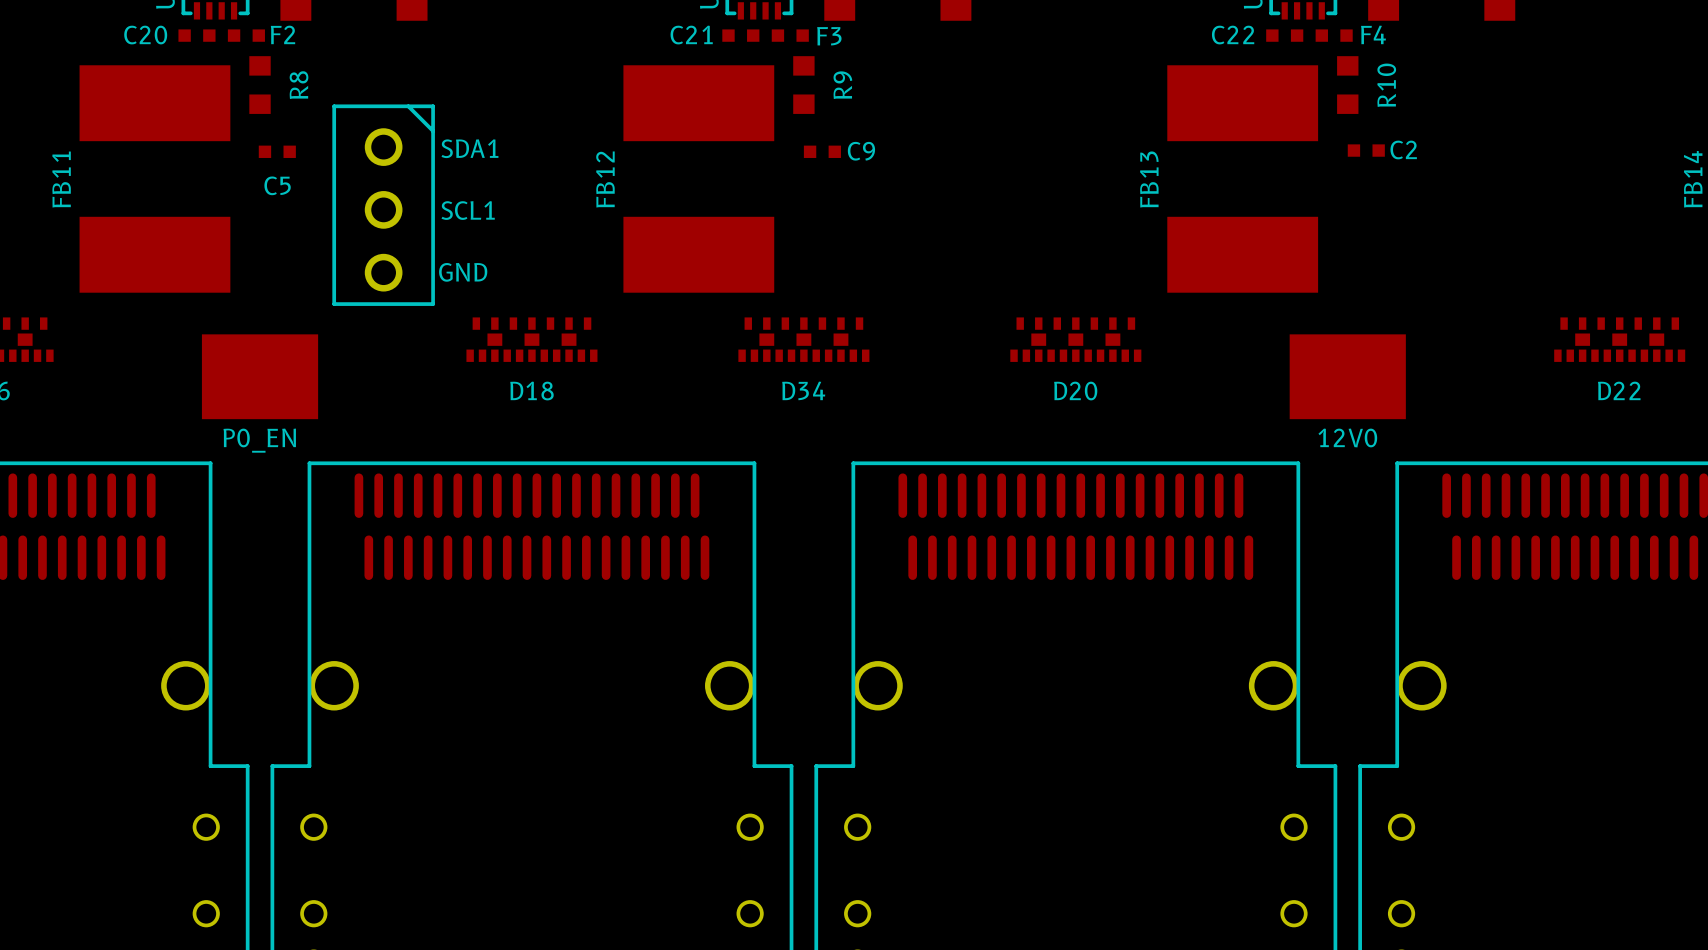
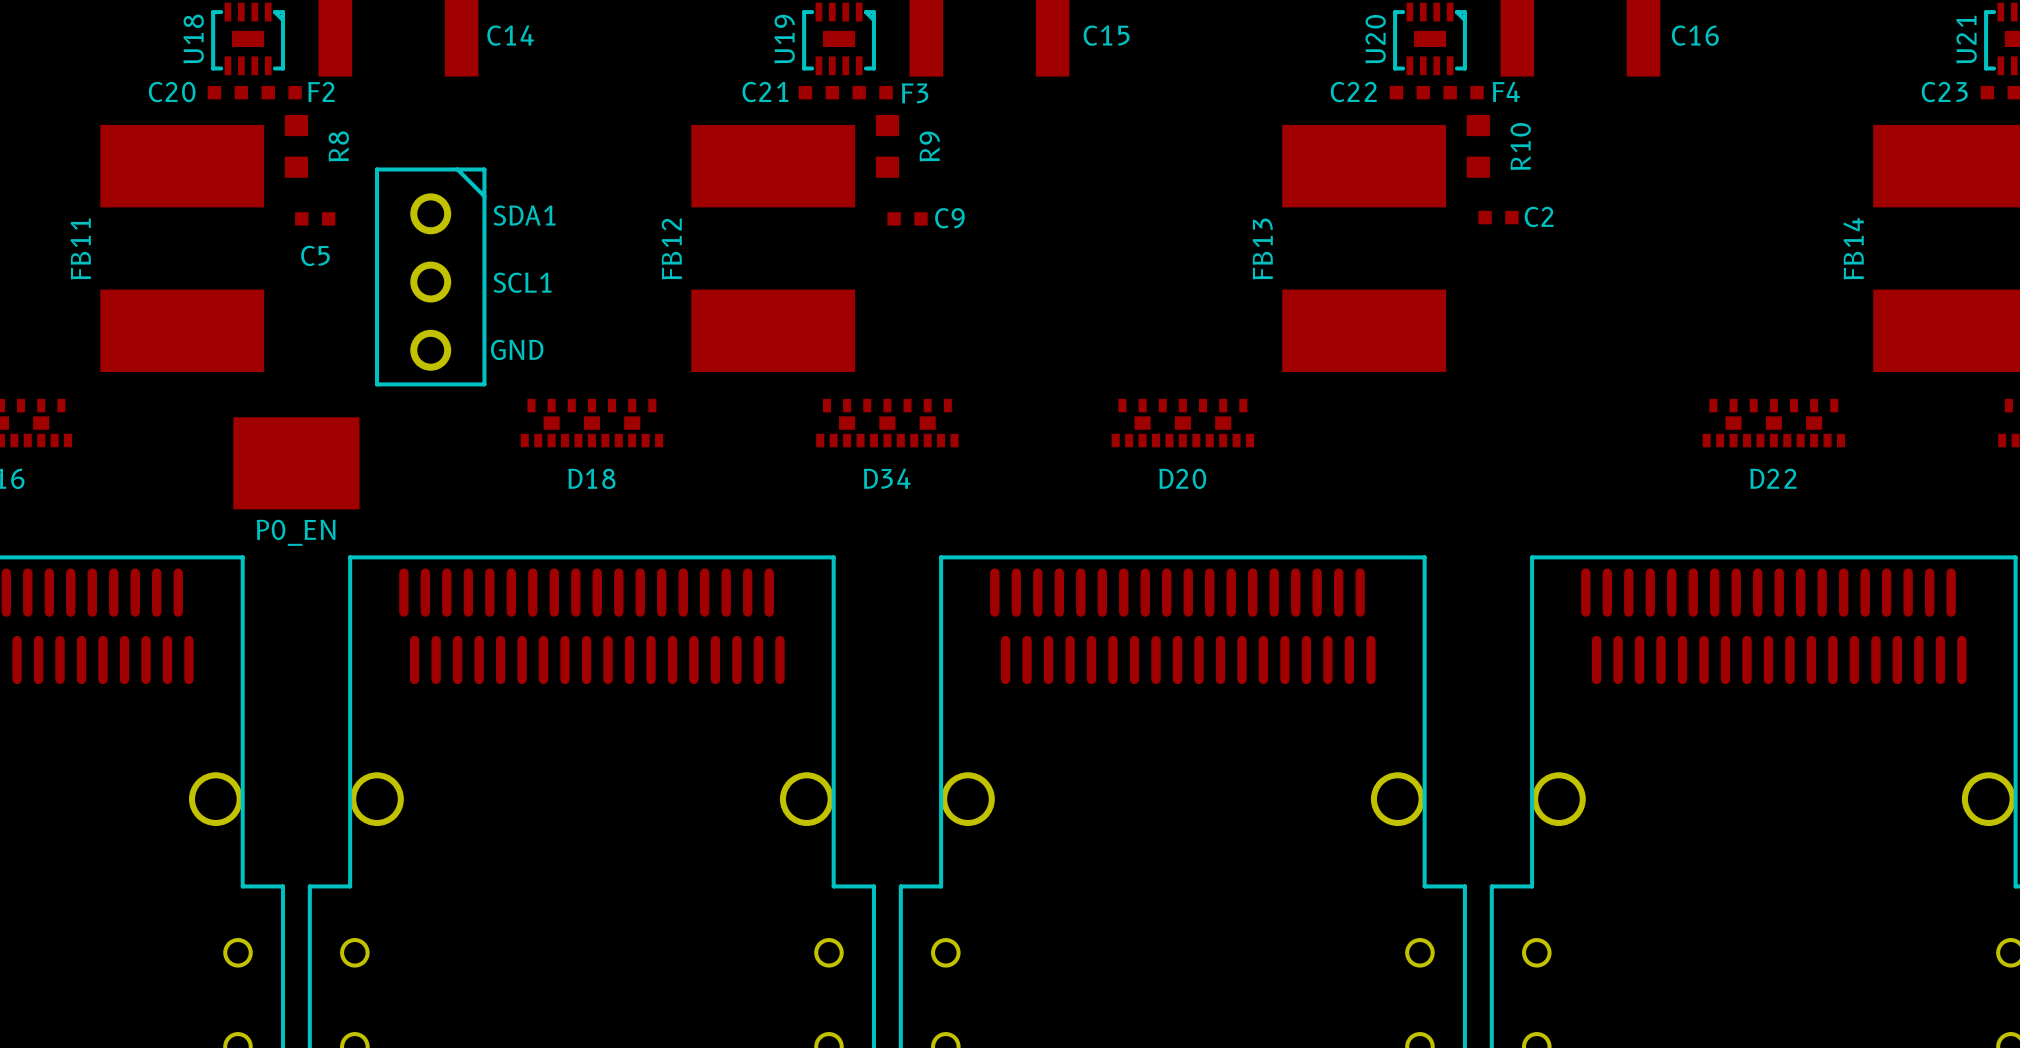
part: (1347, 376) -> none
text: 12V0 (1347, 437) -> none

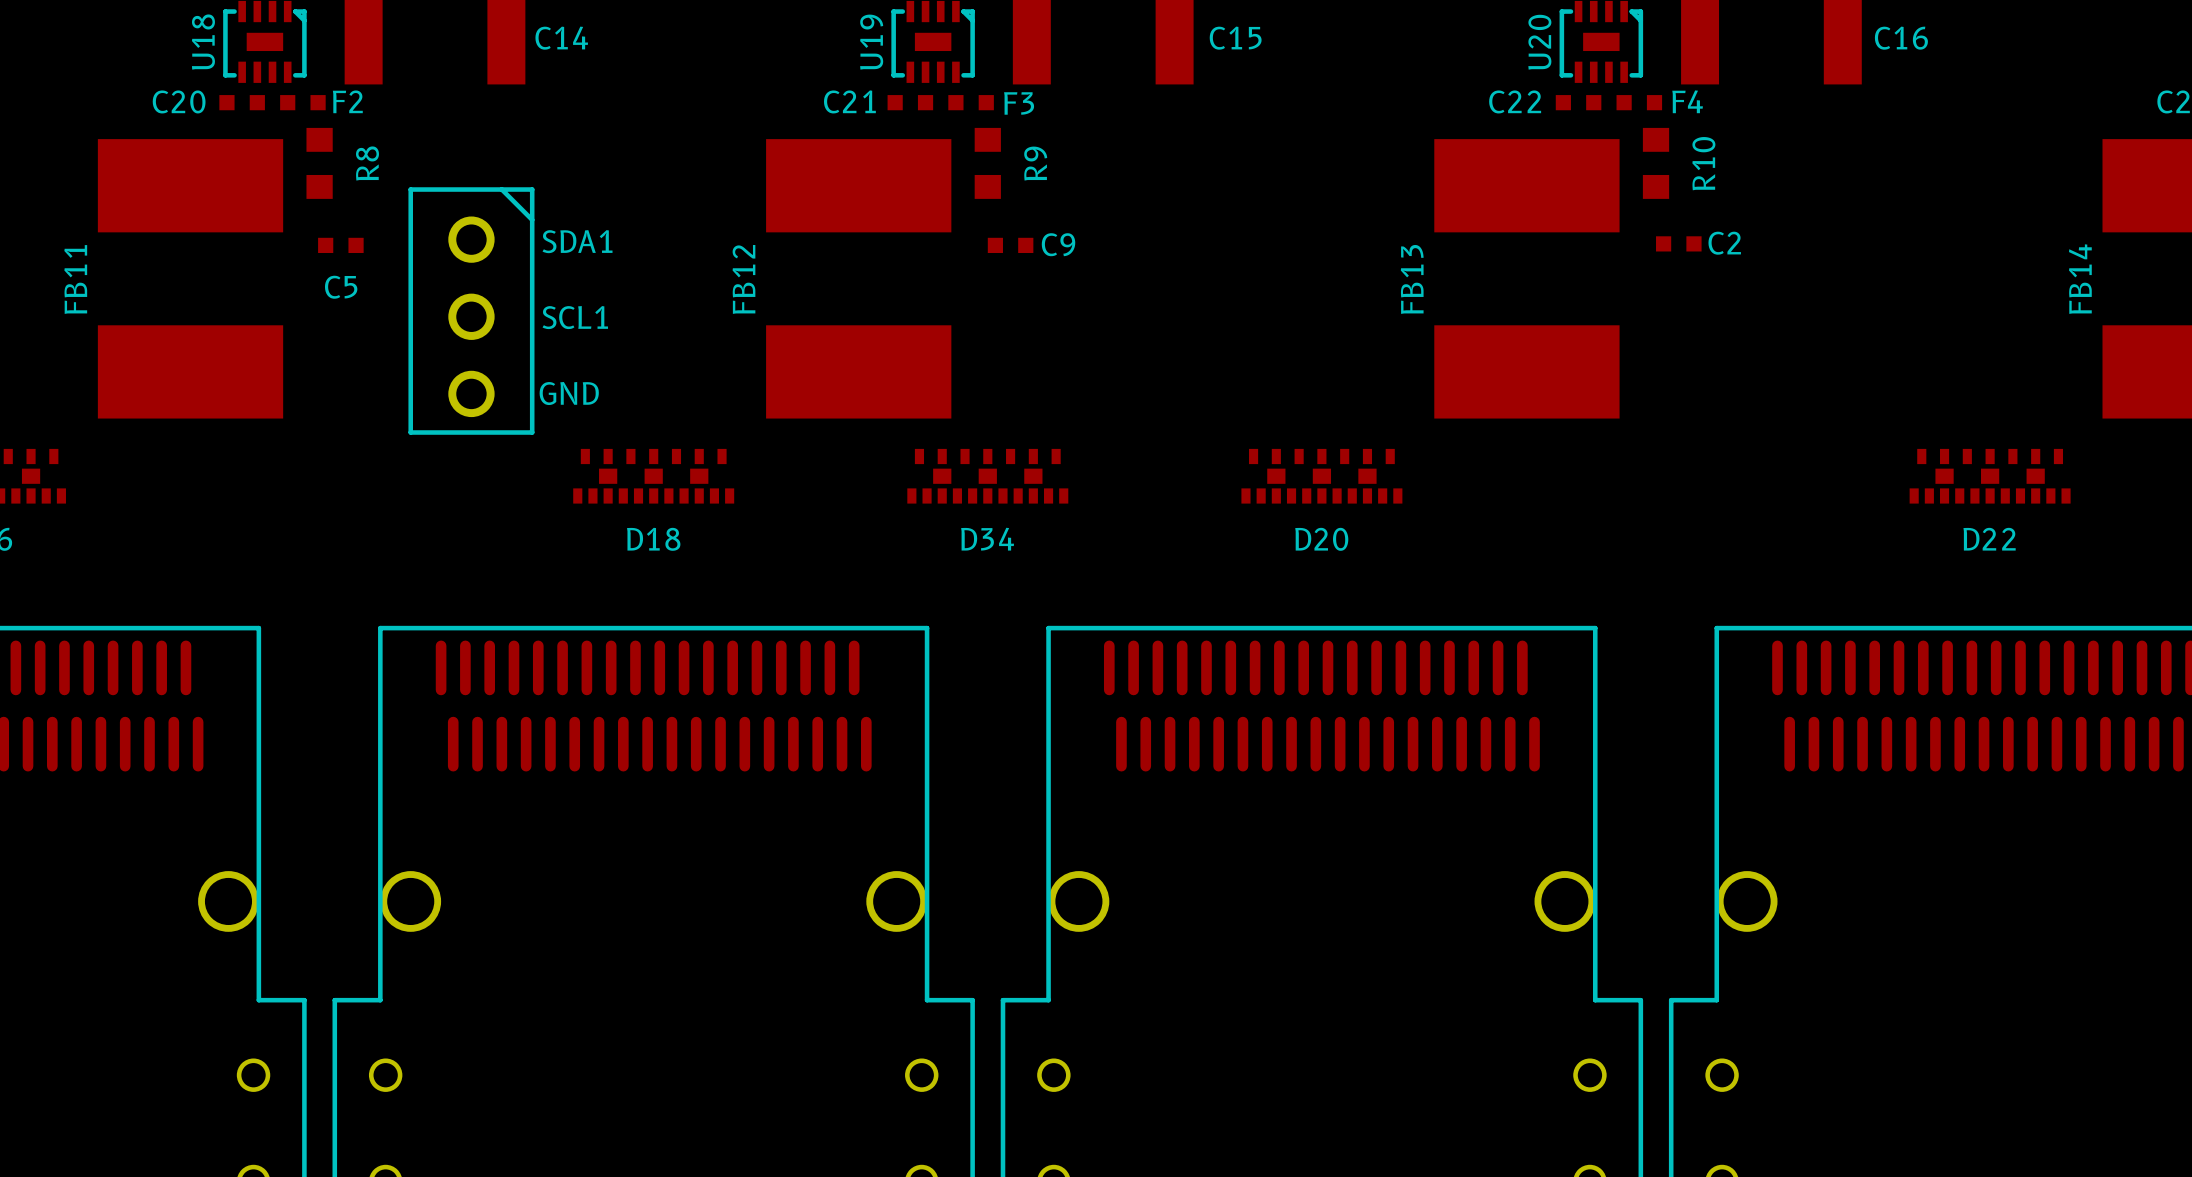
part: (296, 463) -> none
text: P0_EN (296, 532) -> none

